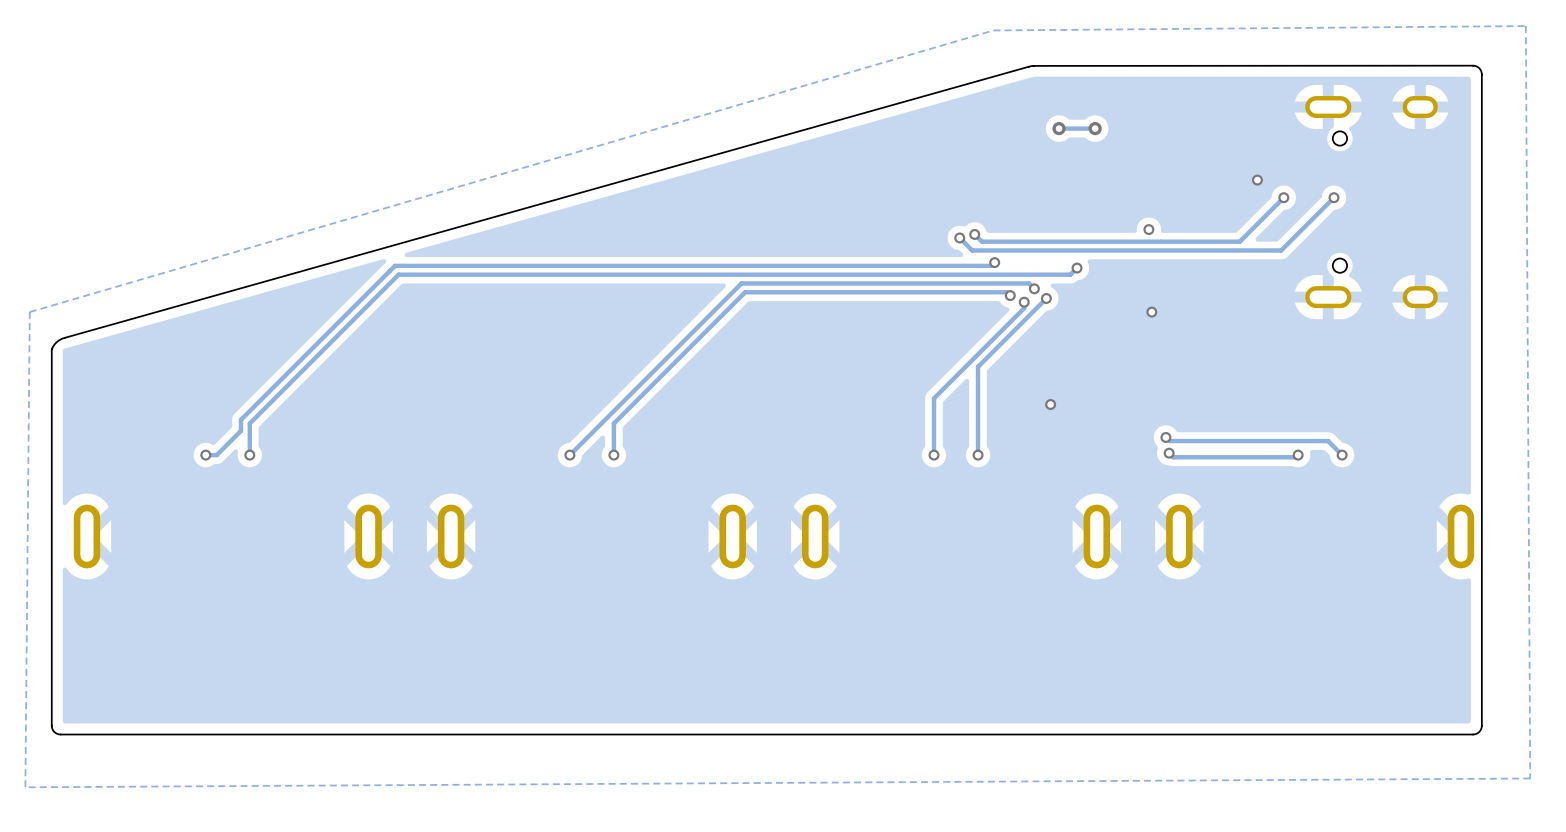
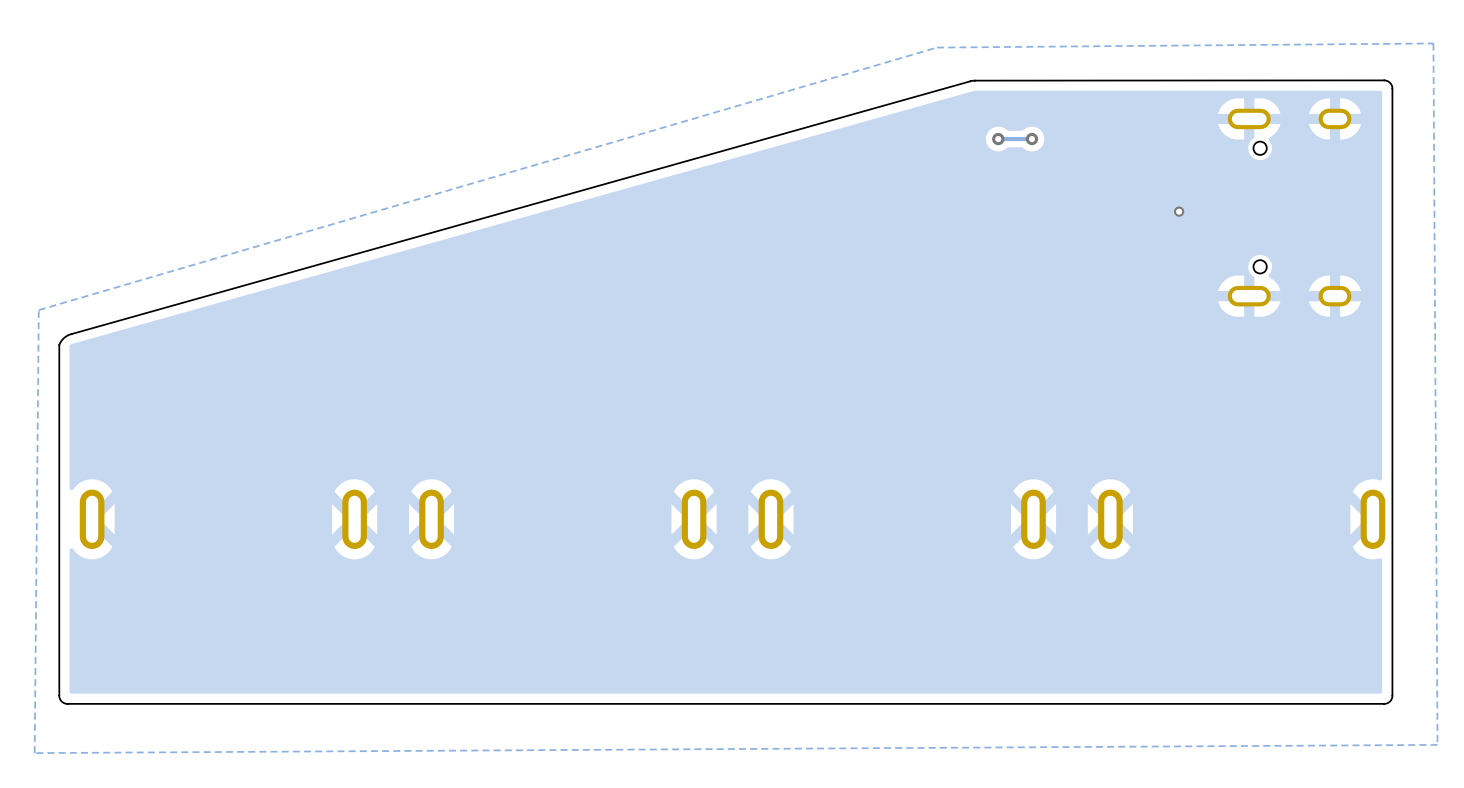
via: (1257, 180) -> none
track: (1283, 197) (1239, 241) (981, 241) (974, 234) -> none
via: (1283, 197) -> none
track: (1334, 197) (1281, 250) (972, 250) (959, 237) -> none
via: (1334, 197) -> none
via: none -> (1179, 211)
via: (1148, 229) -> none
via: (974, 234) -> none
via: (959, 237) -> none
track: (994, 262) (991, 265) (394, 265) (240, 419) (240, 430) (216, 455) (205, 455) -> none
via: (994, 262) -> none
track: (1077, 268) (1070, 274) (398, 274) (249, 423) (249, 455) -> none
via: (1077, 268) -> none
track: (1034, 288) (1029, 283) (741, 283) (569, 455) -> none
via: (1034, 288) -> none
track: (1010, 295) (1007, 292) (745, 292) (613, 423) (613, 455) -> none
via: (1010, 295) -> none
track: (1046, 298) (978, 366) (978, 455) -> none
via: (1046, 298) -> none
track: (1024, 302) (1024, 308) (934, 398) (934, 455) -> none
via: (1024, 302) -> none
via: (1151, 312) -> none
via: (1050, 404) -> none
track: (1165, 437) (1169, 441) (1328, 441) (1342, 455) -> none
via: (1165, 437) -> none
track: (1169, 453) (1173, 457) (1295, 457) (1298, 455) -> none
via: (1169, 453) -> none
via: (205, 455) -> none
via: (249, 455) -> none
via: (569, 455) -> none
via: (613, 455) -> none
via: (934, 455) -> none
via: (978, 455) -> none
via: (1298, 455) -> none
via: (1342, 455) -> none

